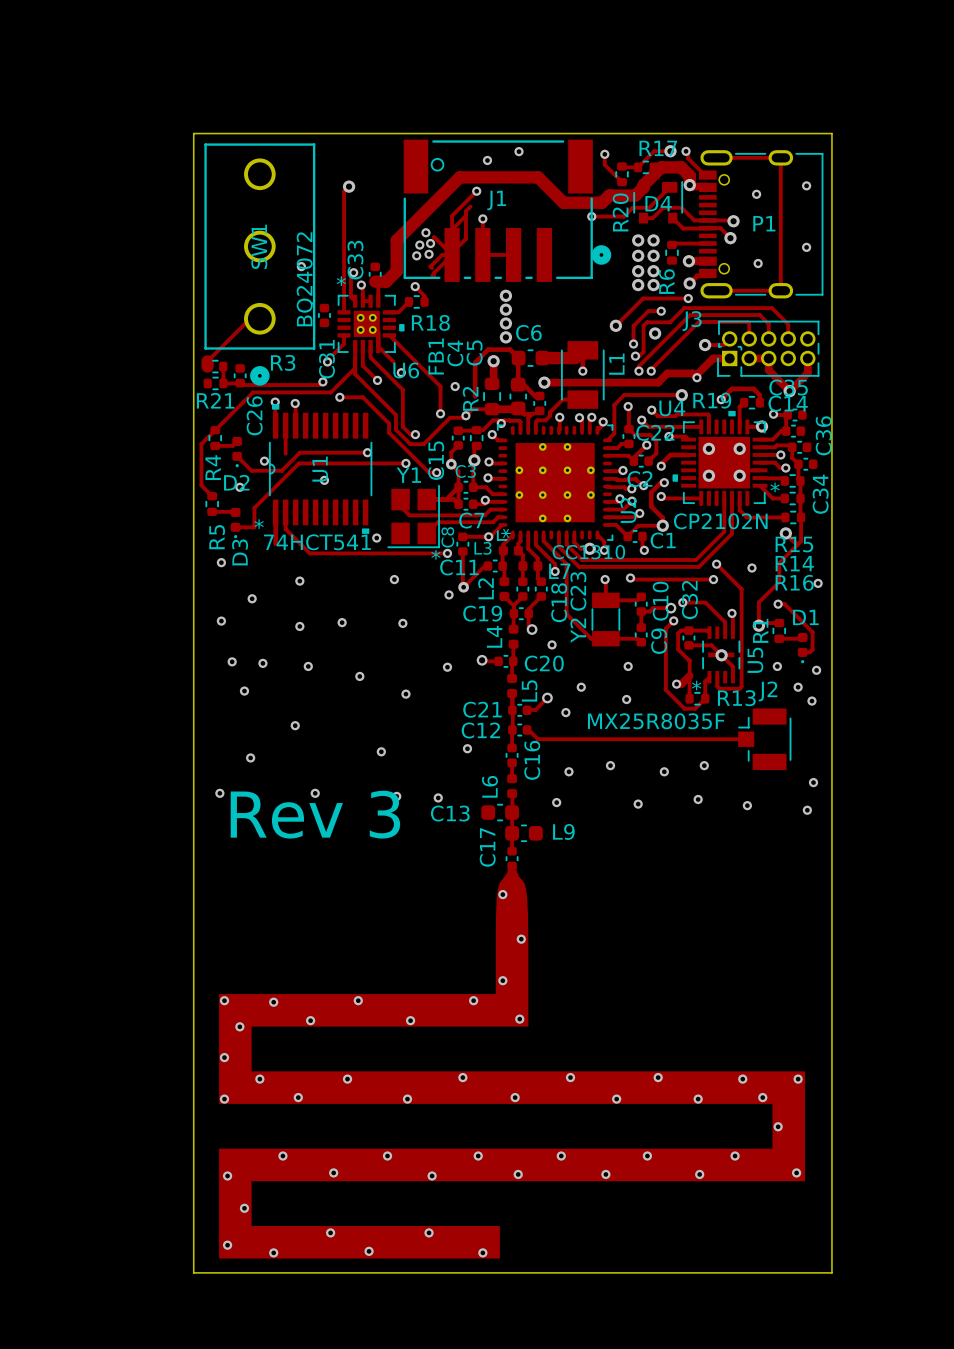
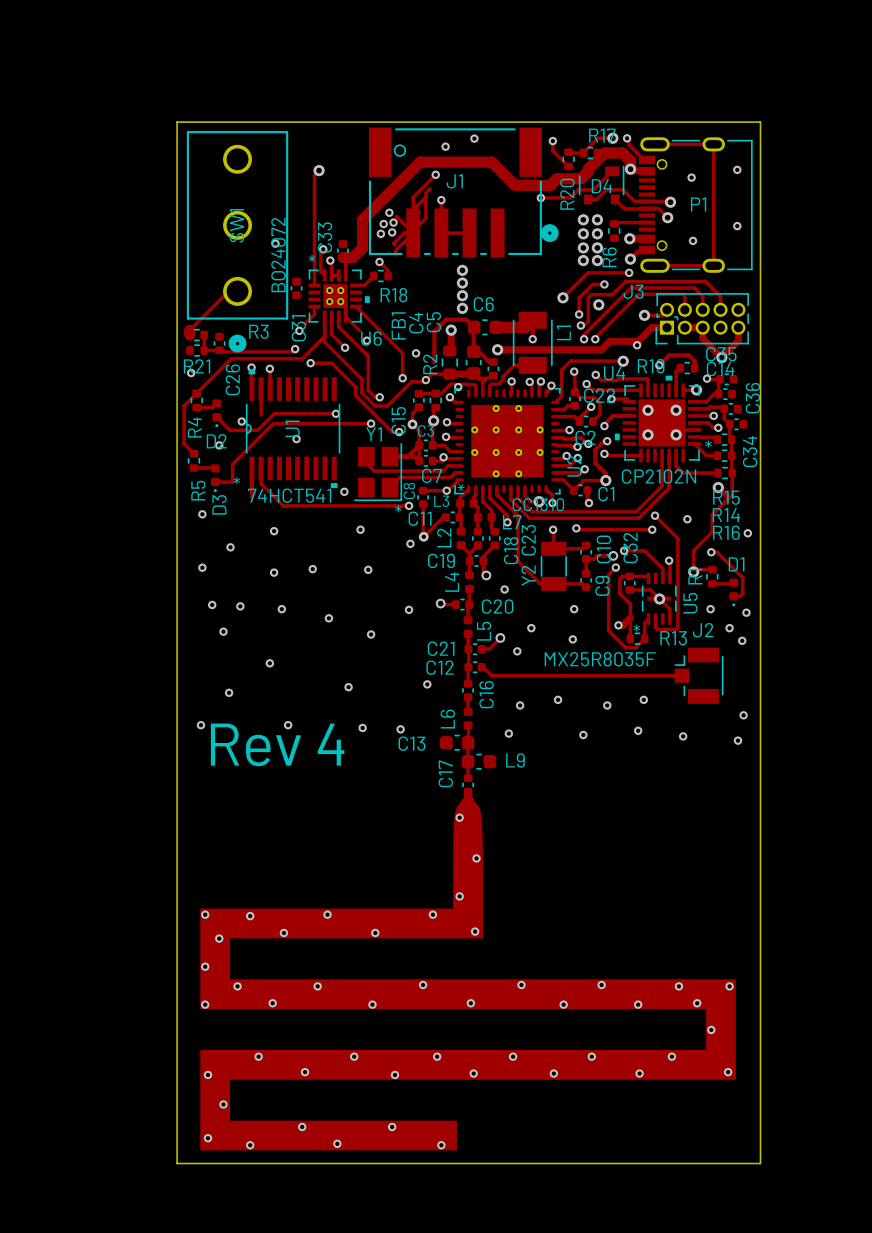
via: none -> (191, 373)
text: Rev 3 (315, 814) -> Rev 4 (277, 744)

